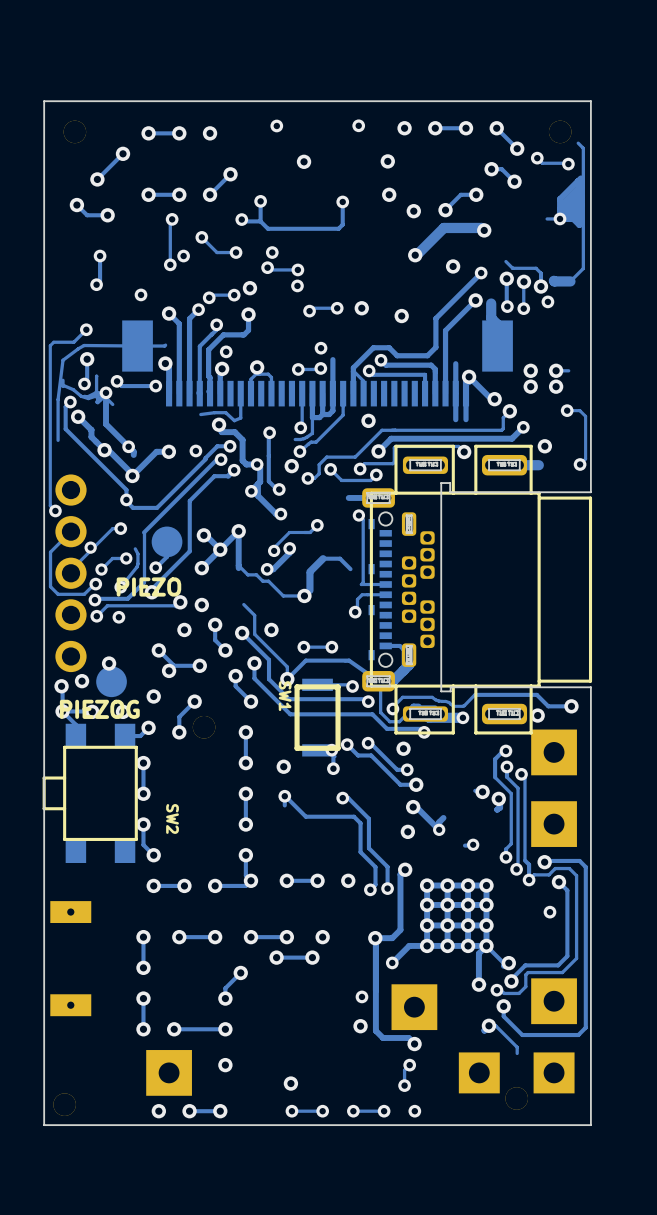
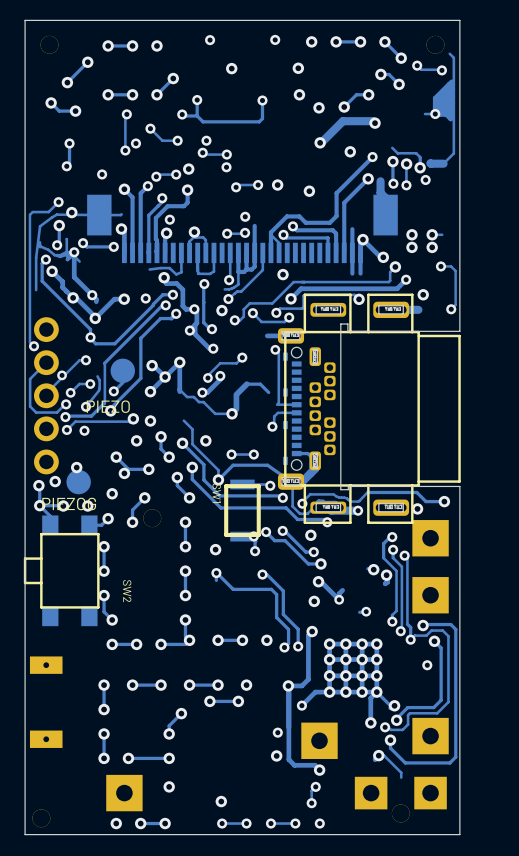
via: none -> (71, 212)
track: none -> (213, 252) (213, 271) (210, 273) (198, 273) (197, 252) (197, 271)

